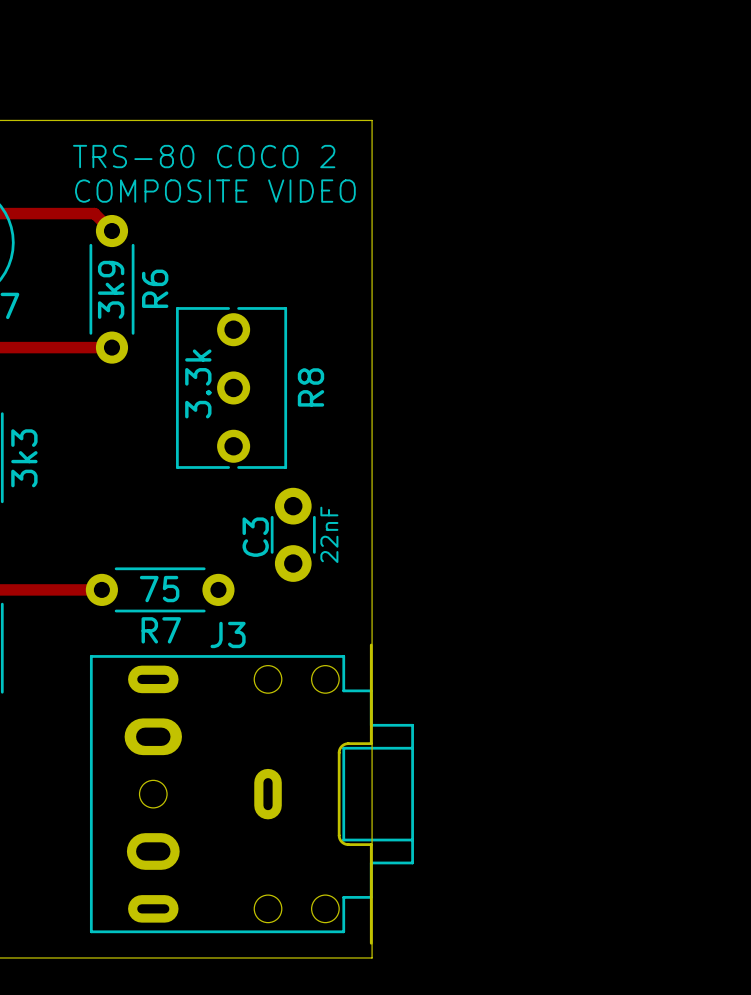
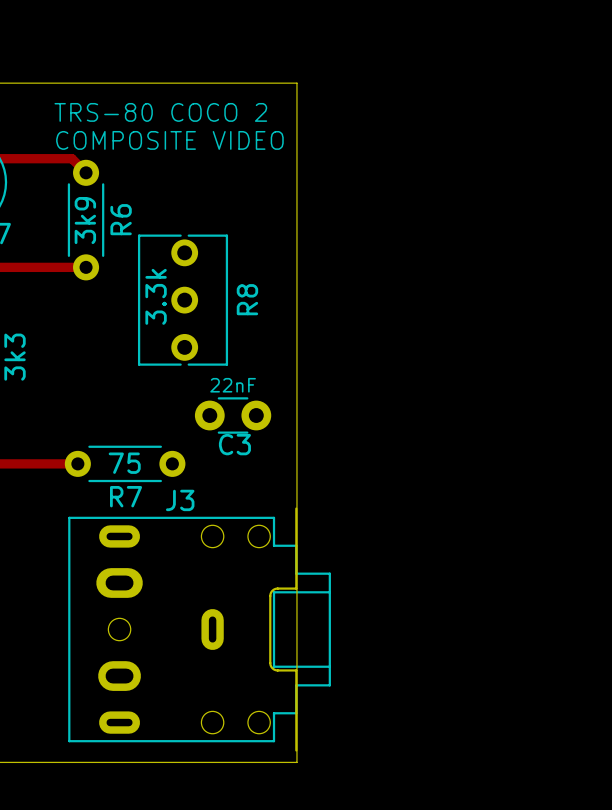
C3 rotation: 0° (293, 534) -> 90° clockwise (233, 415)
C3 value position: 22nF (329, 534) -> 22nF (233, 385)
C3 name position: C3 (255, 537) -> C3 (234, 444)

